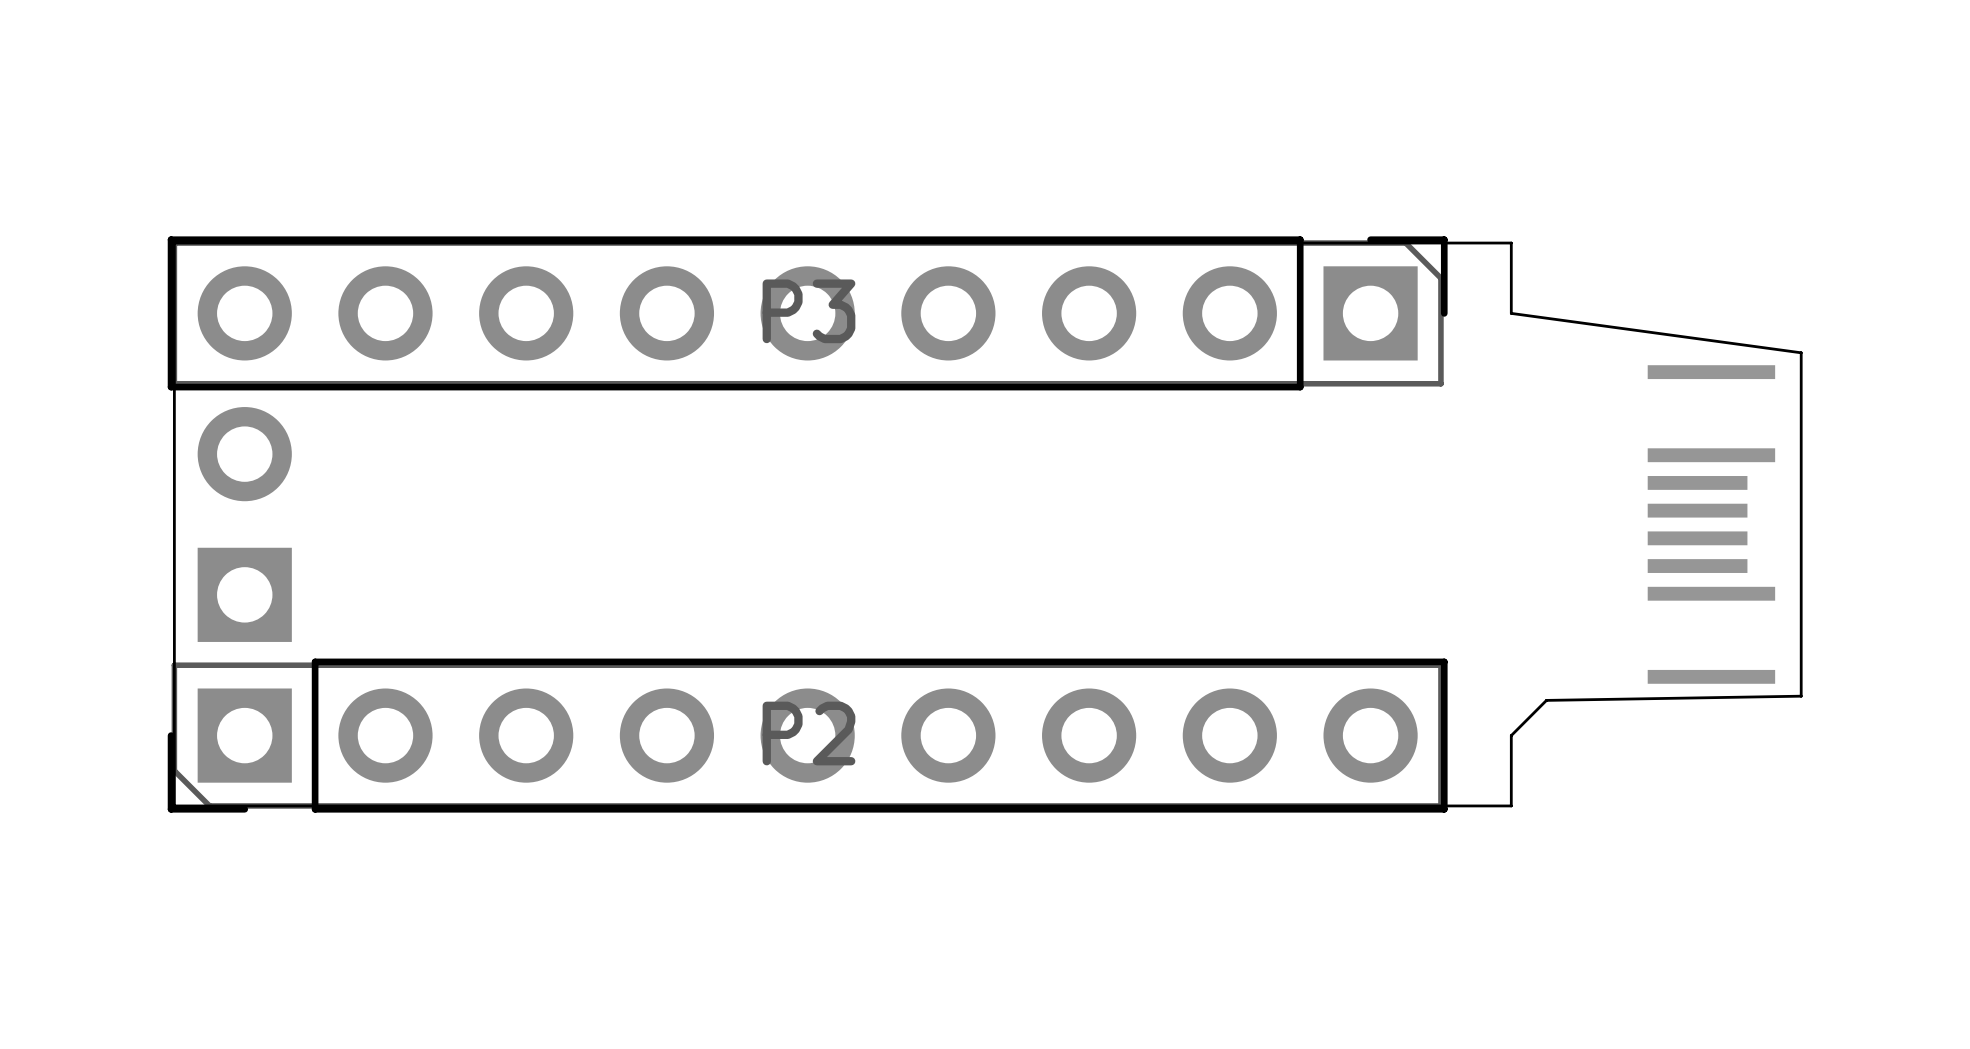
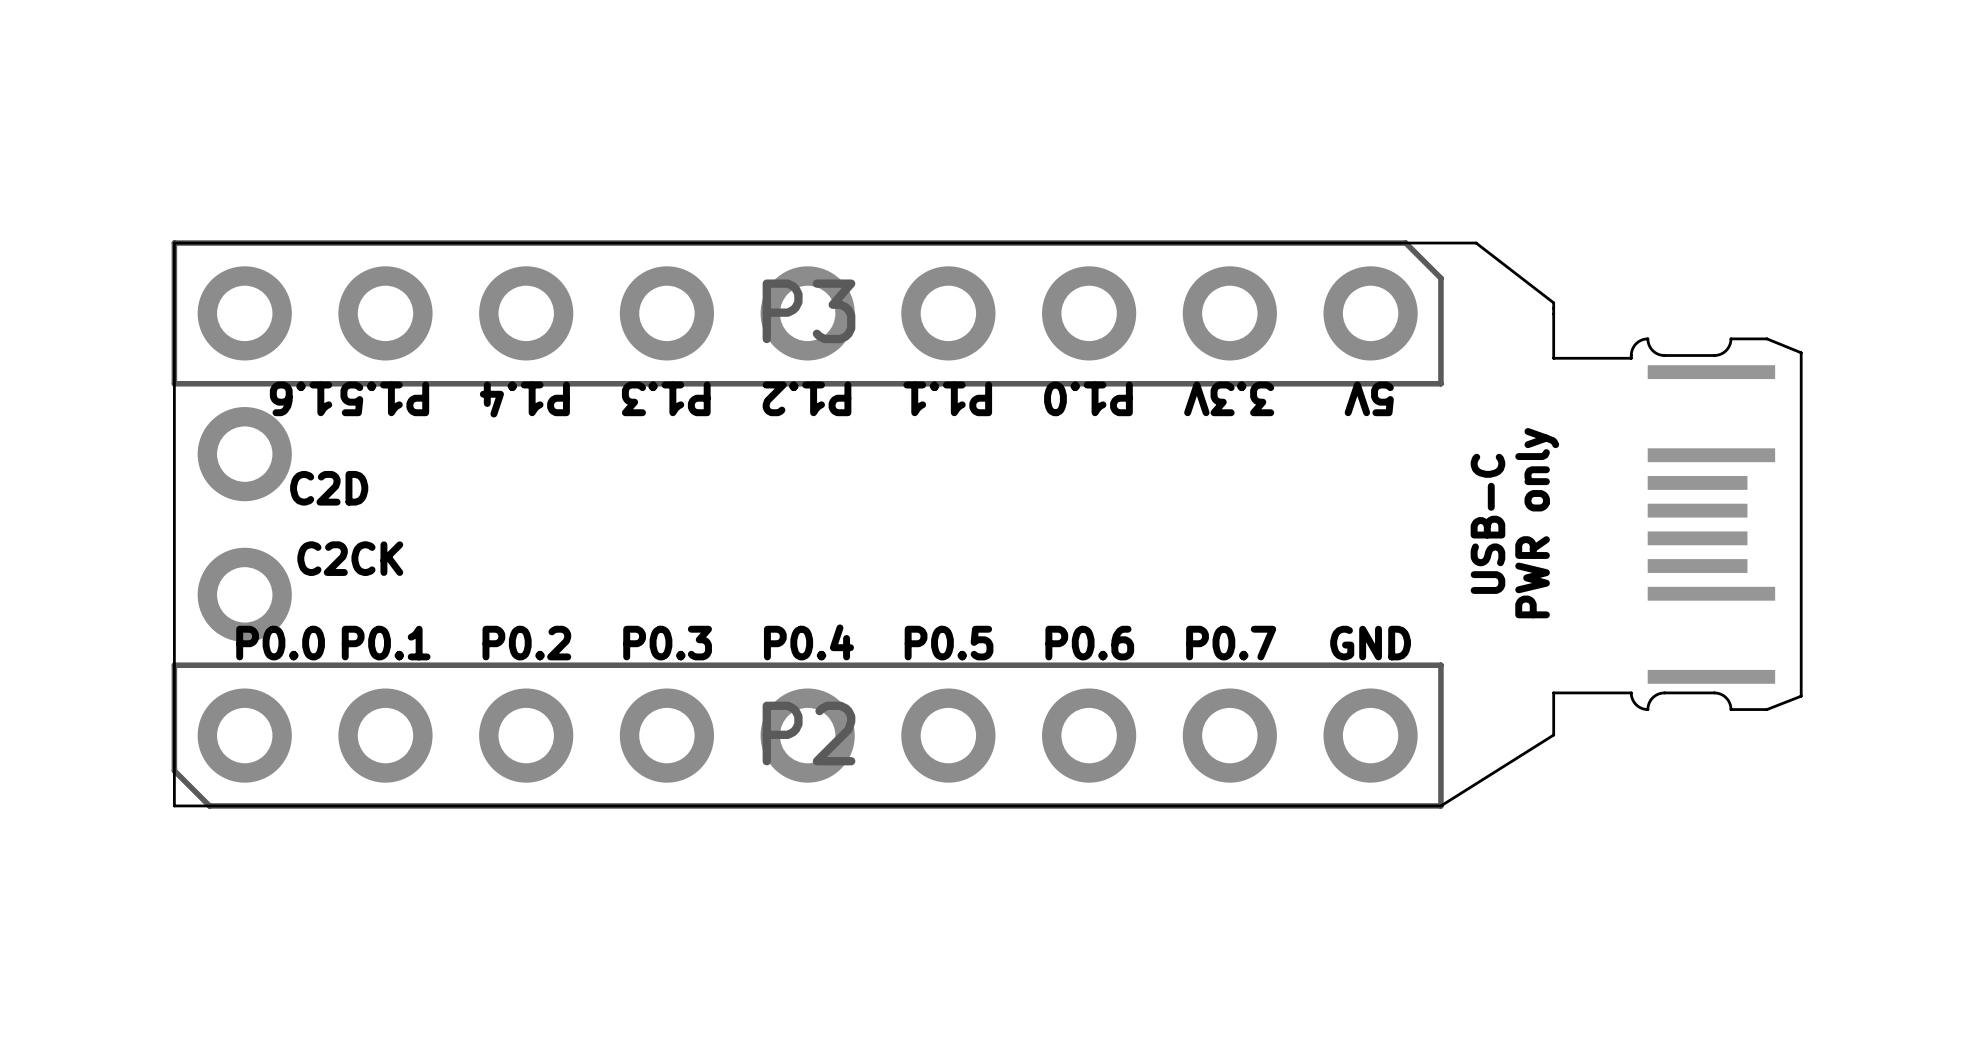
part footprint: [167, 236, 1448, 391] -> [171, 240, 1444, 387]
board edge: (1476, 243) (1511, 243) (1511, 313) (1801, 352) -> (1476, 243) (1553, 302) (1553, 358) (1631, 358) (1634, 345) (1641, 340) (1647, 338)
board edge: none -> (1647, 338) (1652, 350) (1662, 355) (1718, 354) (1727, 349) (1730, 338) (1767, 338) (1801, 352)
text: none -> 1.6 (301, 398)
text: none -> P1.5 (384, 398)
text: none -> P1.3 (666, 398)
text: none -> P1.2 (807, 398)
text: none -> P1.1 (947, 398)
text: none -> P1.0 (1088, 398)
text: none -> 3.3V (1229, 398)
text: none -> 5V (1369, 398)
text: none -> P1.4 (524, 399)
part footprint: [197, 407, 292, 642] -> [197, 407, 292, 642]
text: none -> C2D (329, 488)
text: none -> USB-C (1487, 523)
text: none -> PWR only (1537, 523)
text: none -> C2CK (350, 558)
text: none -> P0.4 (808, 642)
text: none -> P0.0 (280, 643)
text: none -> P0.1 (386, 643)
text: none -> P0.2 (526, 643)
text: none -> P0.3 (667, 643)
text: none -> P0.5 (949, 643)
text: none -> P0.6 (1089, 643)
text: none -> P0.7 (1231, 643)
text: none -> GND (1370, 643)
part footprint: [167, 658, 1448, 813] -> [171, 662, 1444, 809]
board edge: (1801, 696) (1546, 700) (1511, 735) (1511, 805) (1440, 805) -> (1801, 696) (1767, 709) (1730, 709) (1727, 699) (1718, 693) (1662, 693) (1651, 699) (1647, 709) (1636, 704) (1631, 692) (1553, 692) (1553, 735) (1440, 805)

